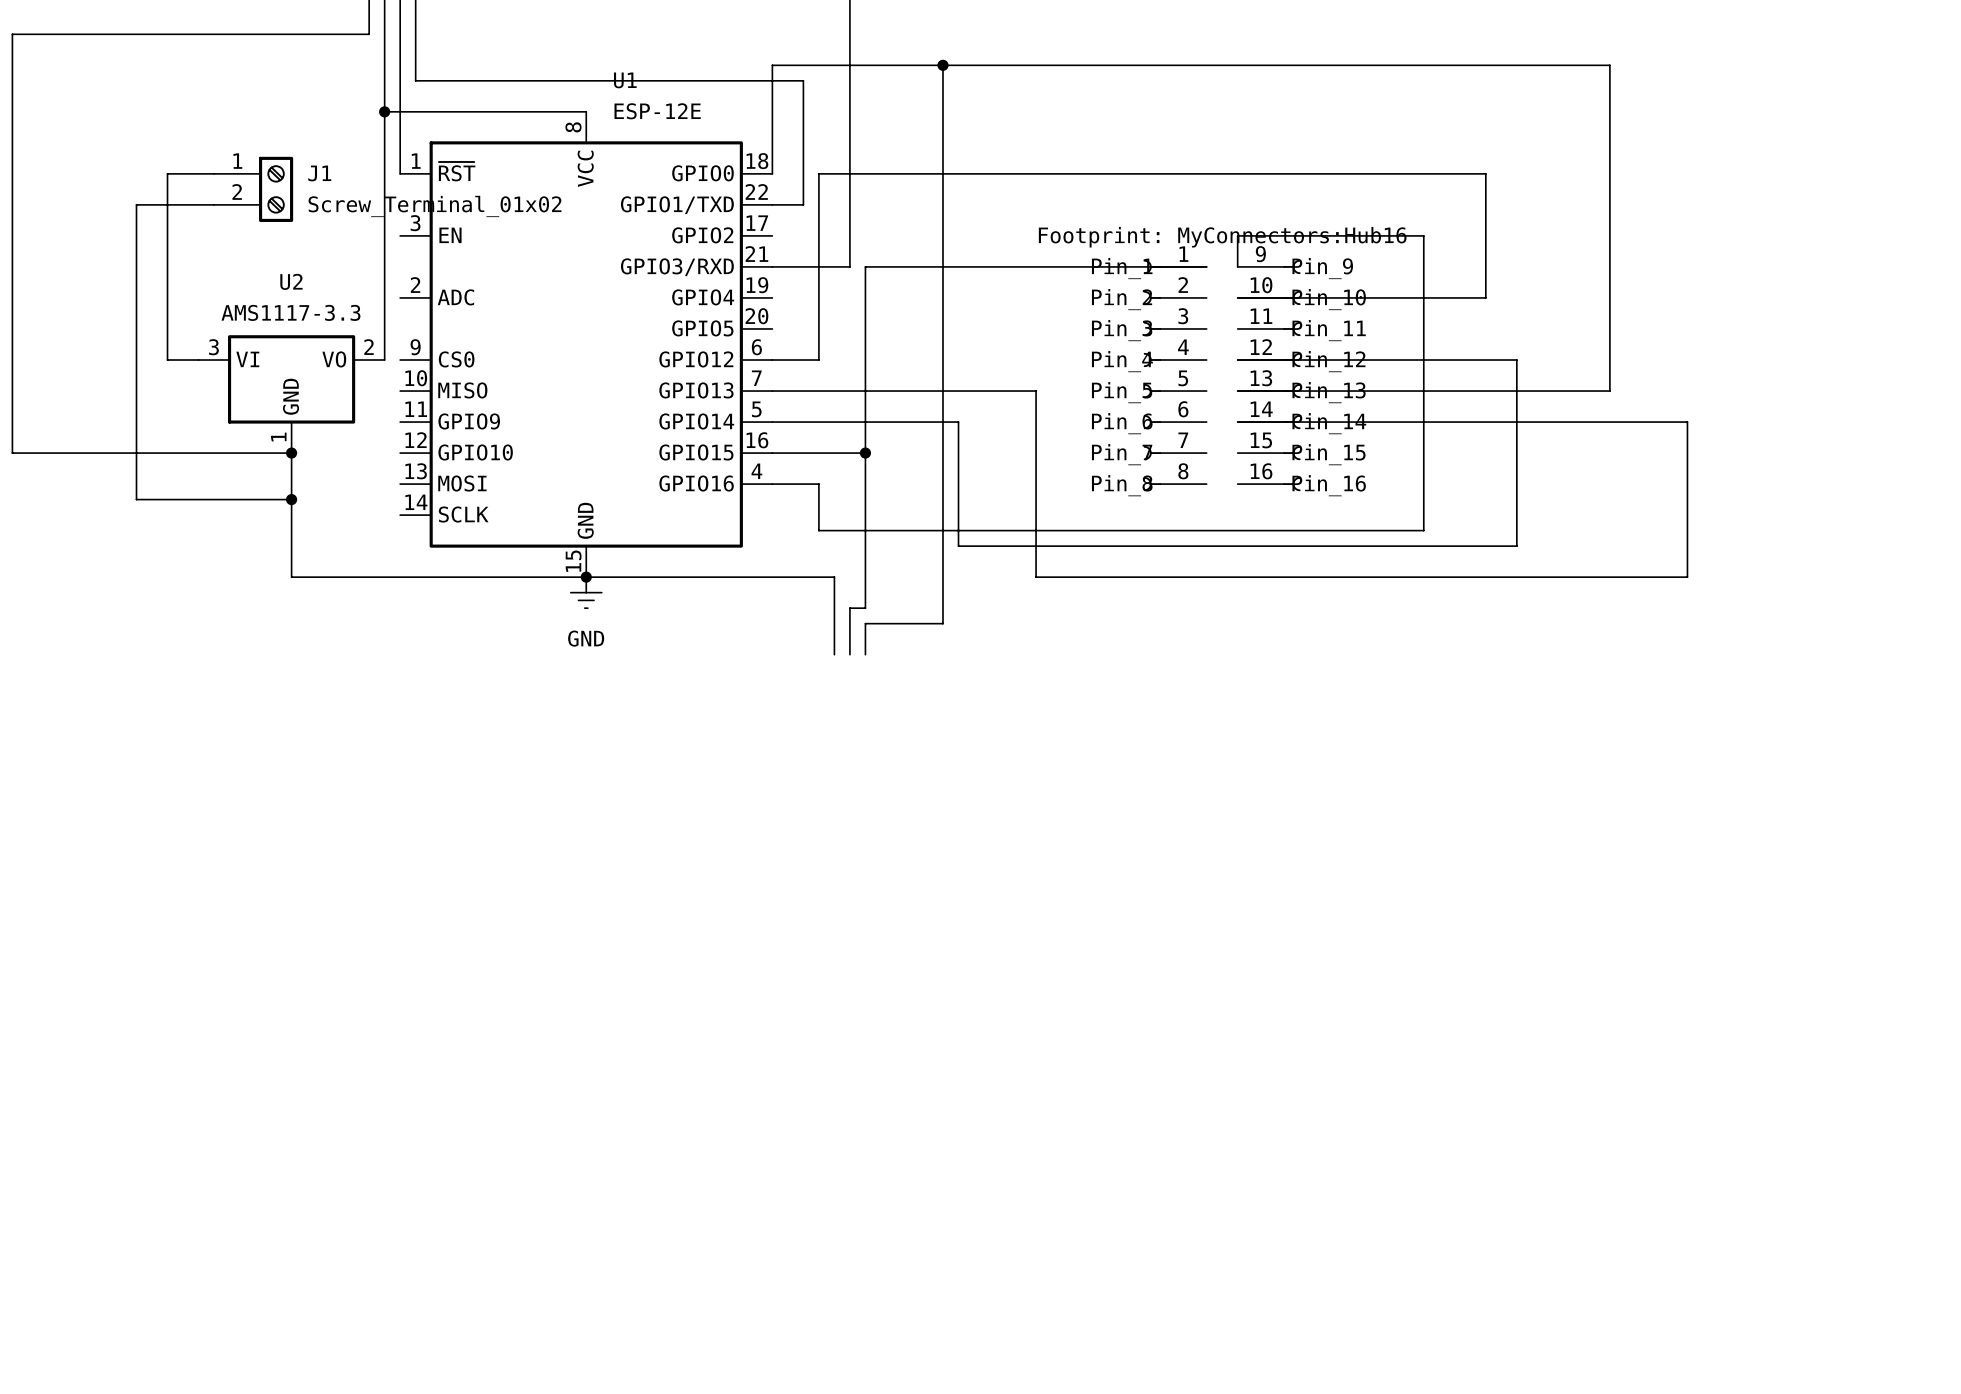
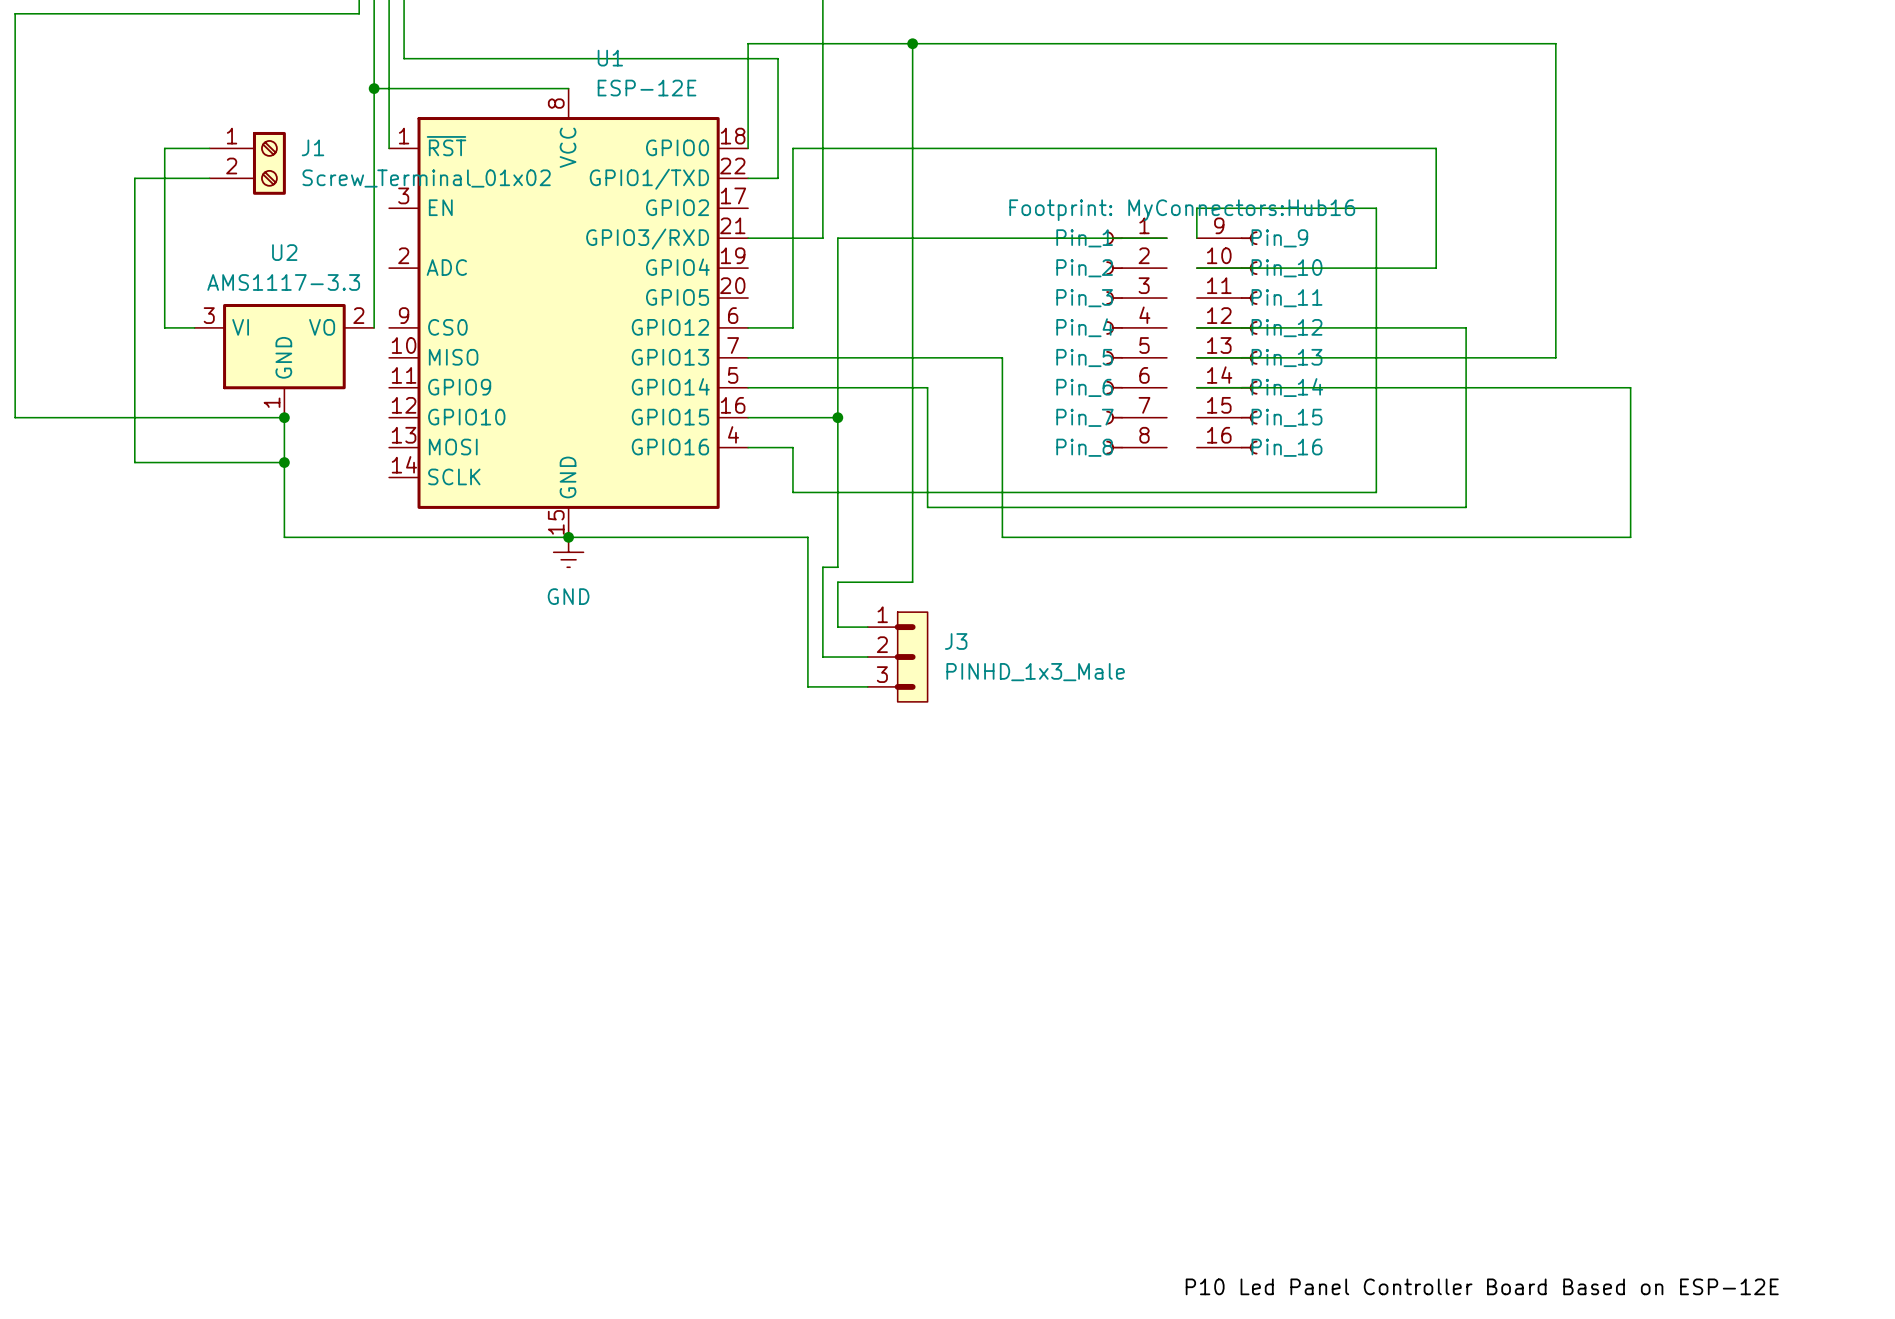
wire: none -> (807, 612) (807, 686) (867, 686)
wire: none -> (822, 612) (822, 657) (867, 657)
wire: none -> (837, 612) (837, 627) (867, 627)
J3: none -> PINHD_1x3_Male (897, 657)
label: none -> P10 Led Panel Controller Board Based on ESP-12E (1482, 1286)

